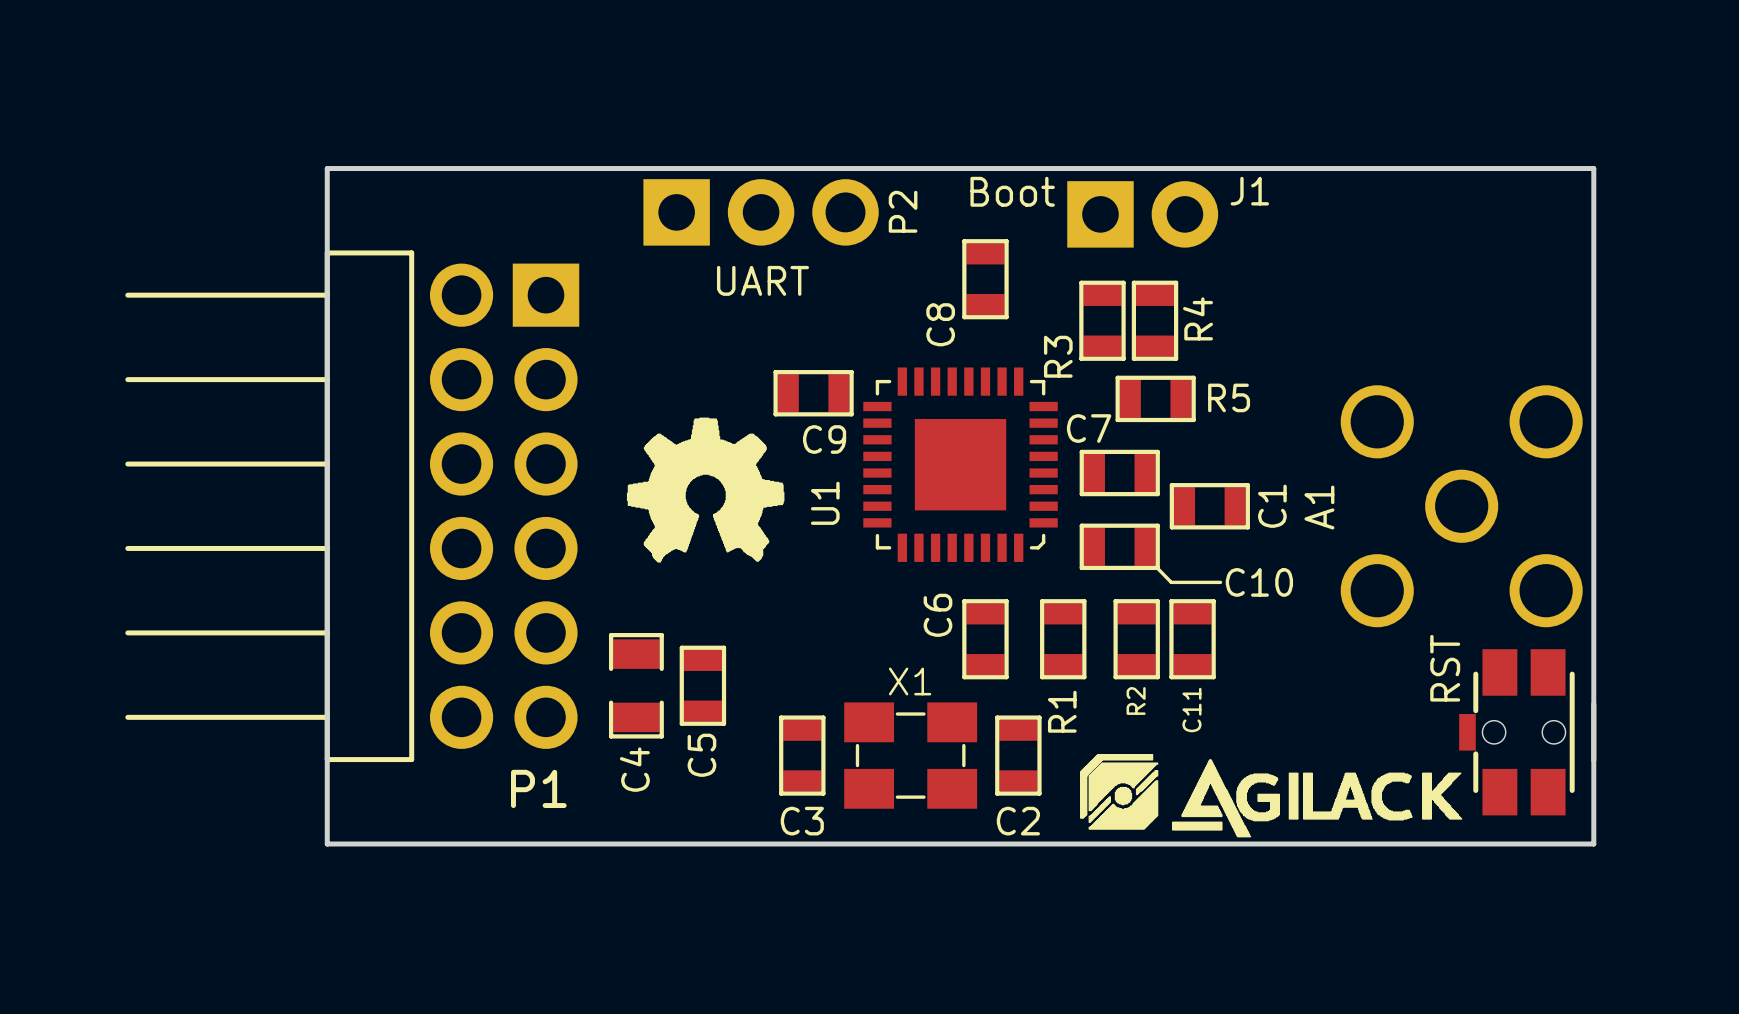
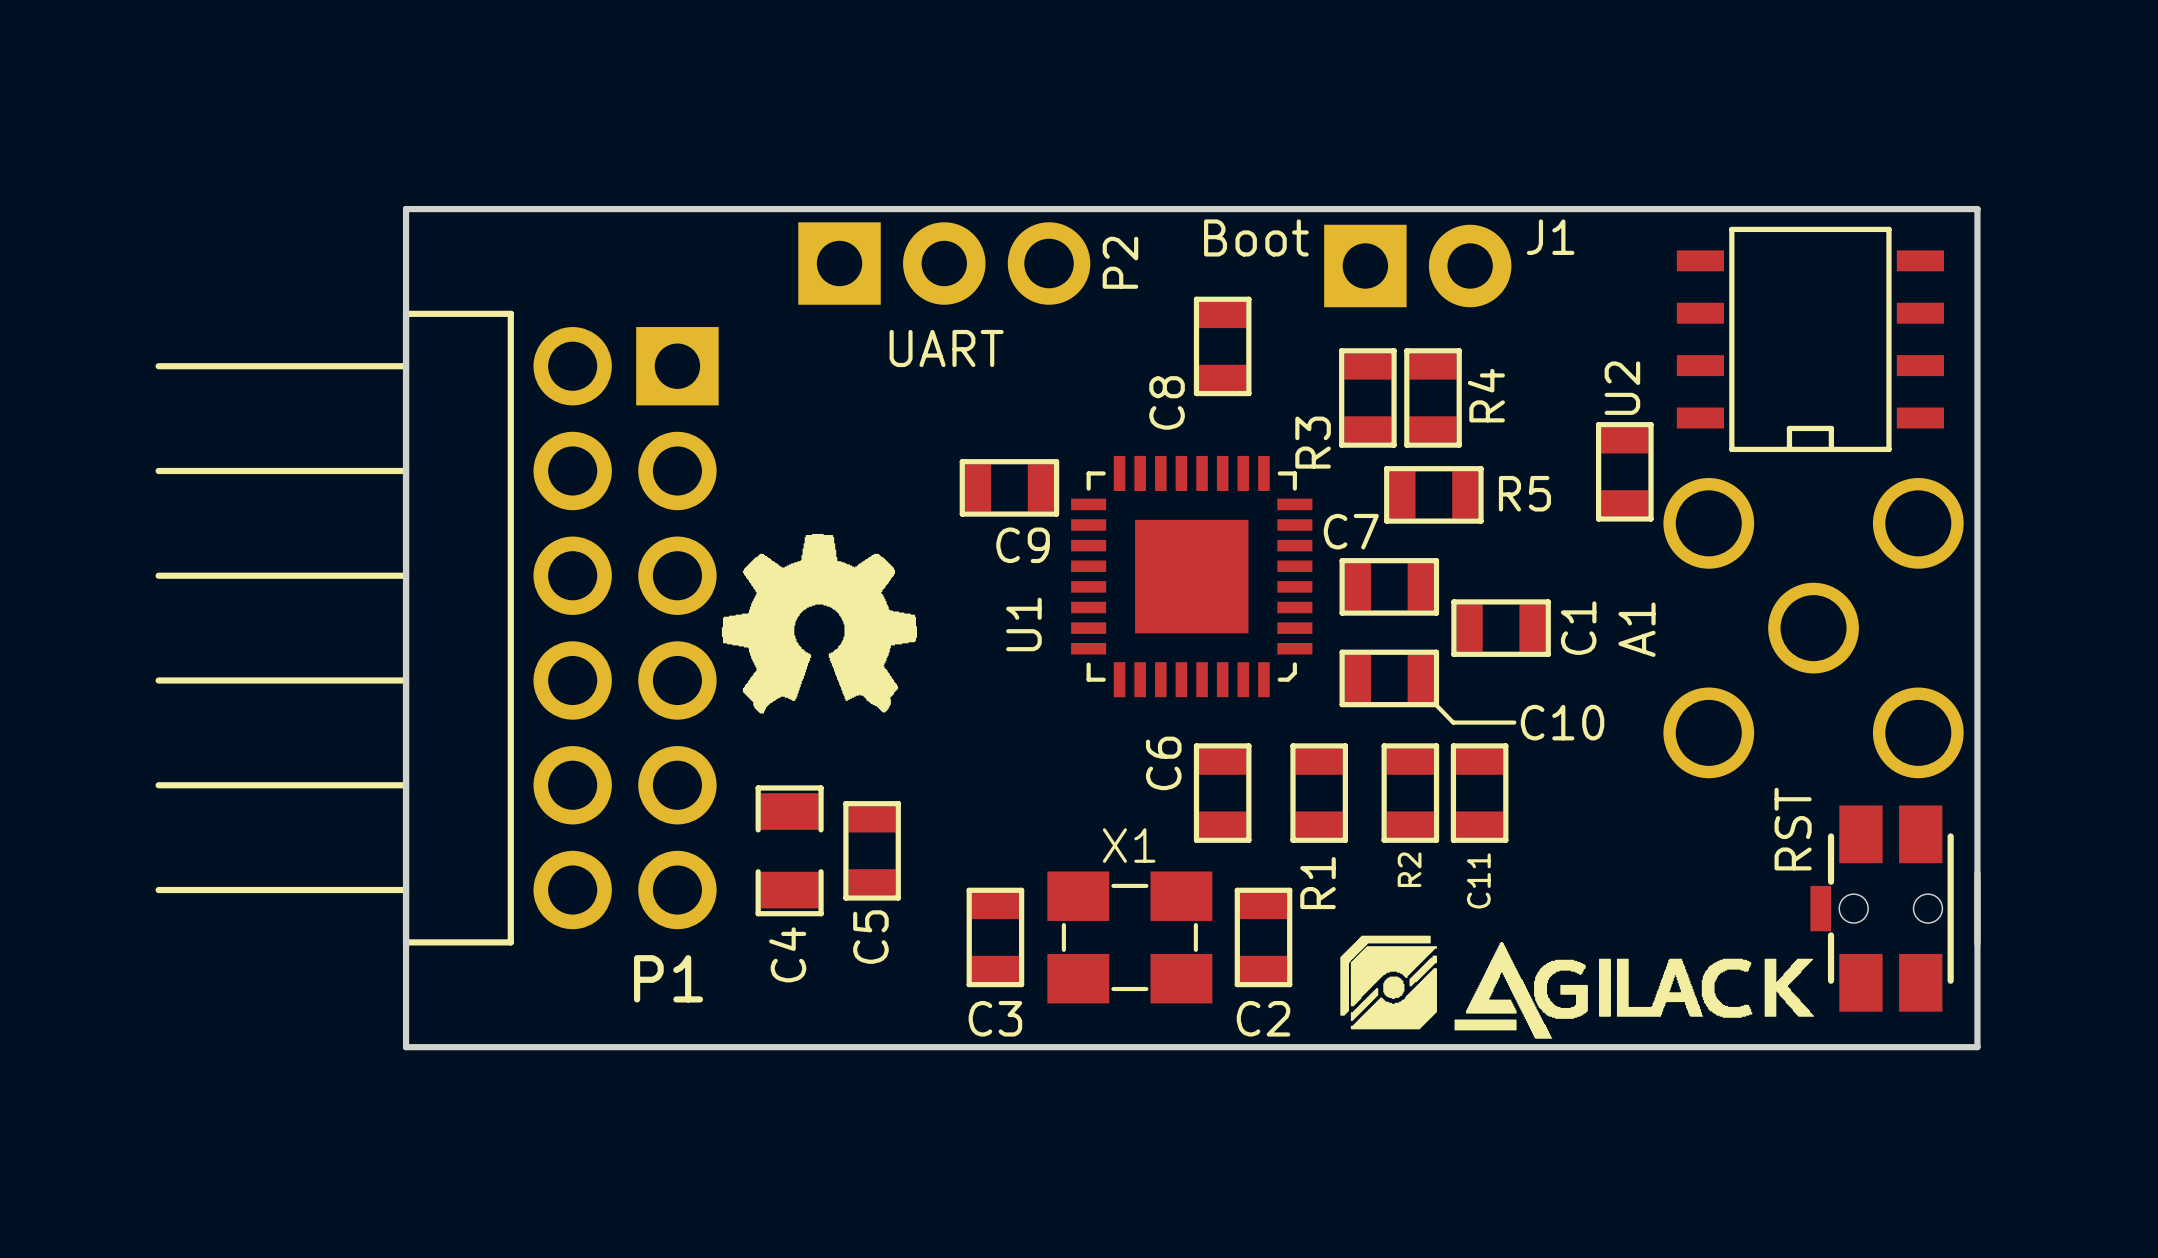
U2: none -> (1810, 339)
part: none -> (1624, 471)
drawing position: (705, 490) -> (819, 623)

